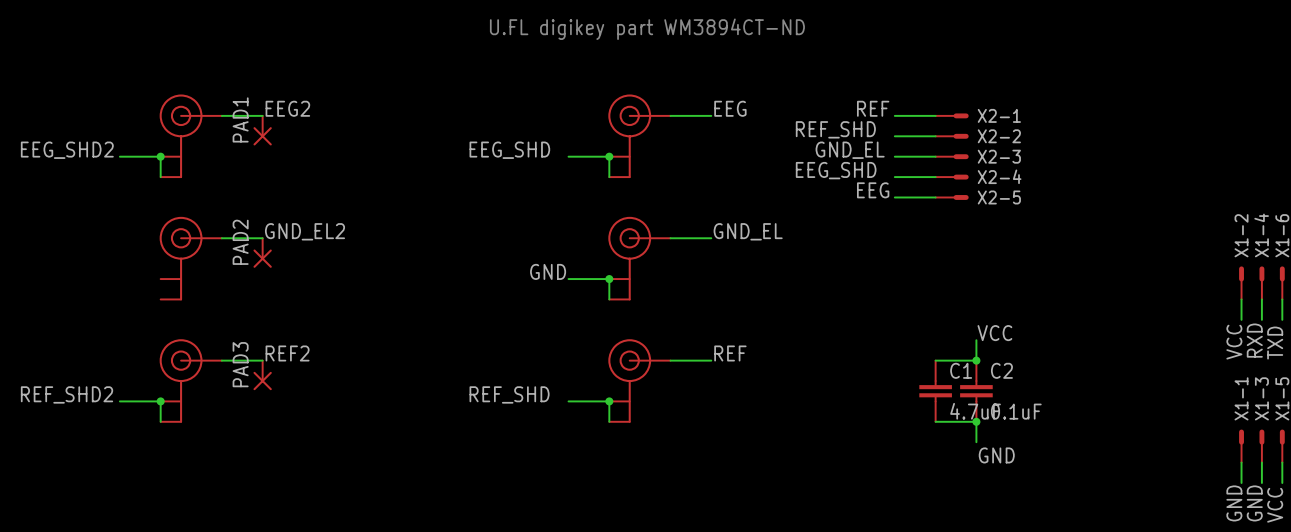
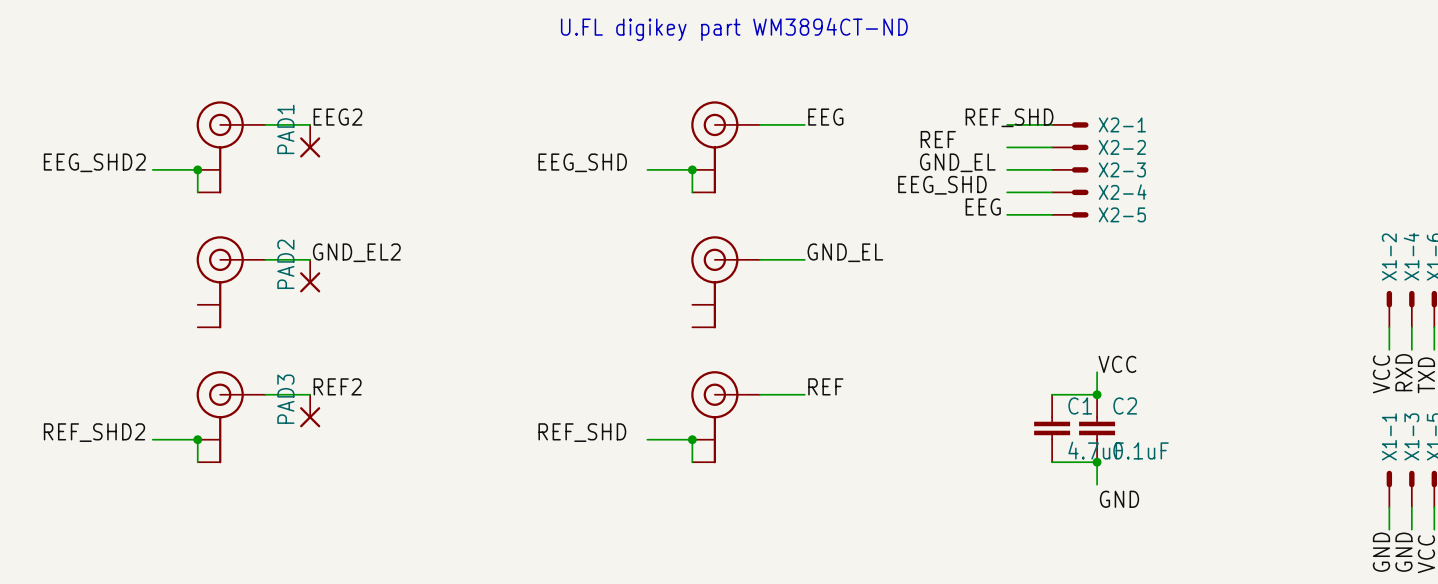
label: REF (873, 108) -> REF_SHD (1009, 117)
label: none -> REF (938, 139)
label: REF_SHD (835, 129) -> none
label: GND (548, 271) -> none
wire: (568, 279) (609, 279) (609, 299) -> none
junction: (609, 279) -> none

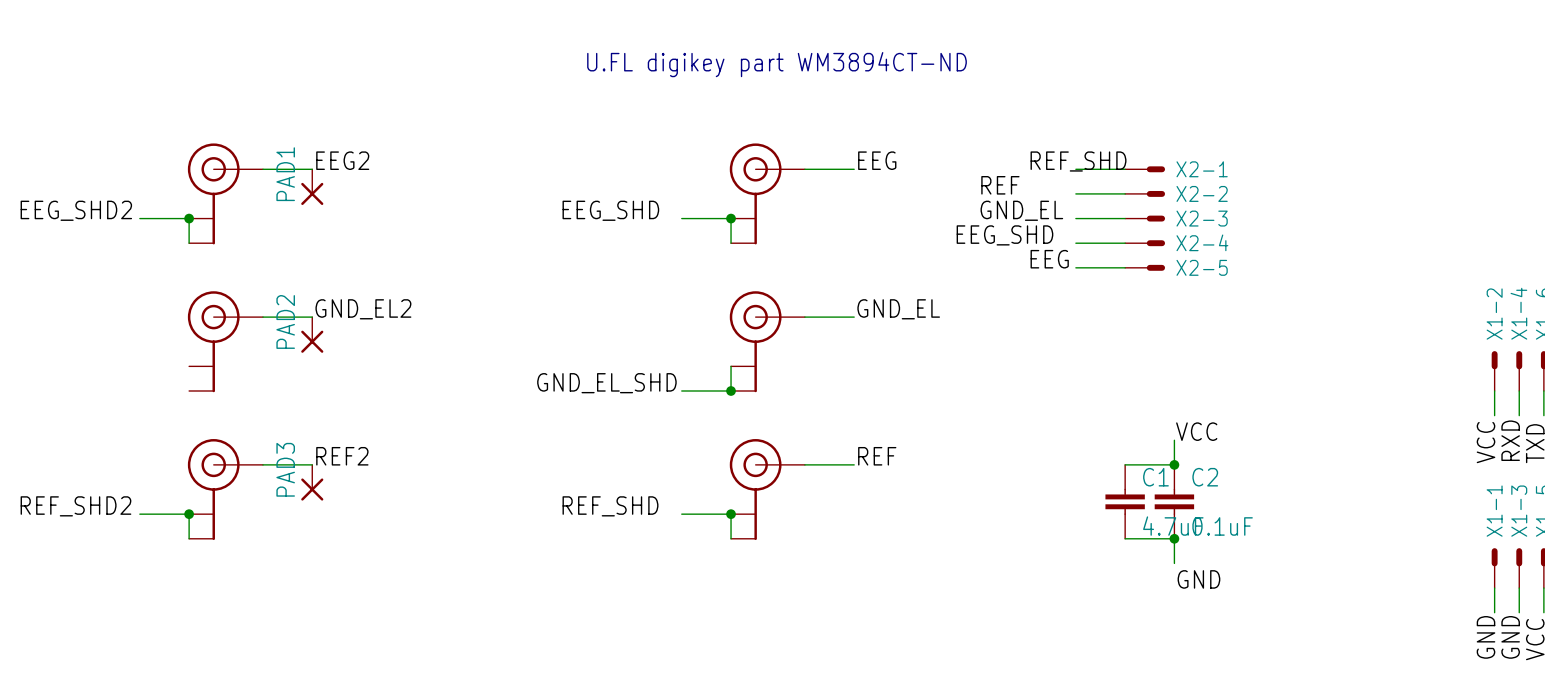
wire: none -> (731, 366) (731, 390) (681, 390)
label: none -> GND_EL_SHD (606, 383)
junction: none -> (731, 390)

